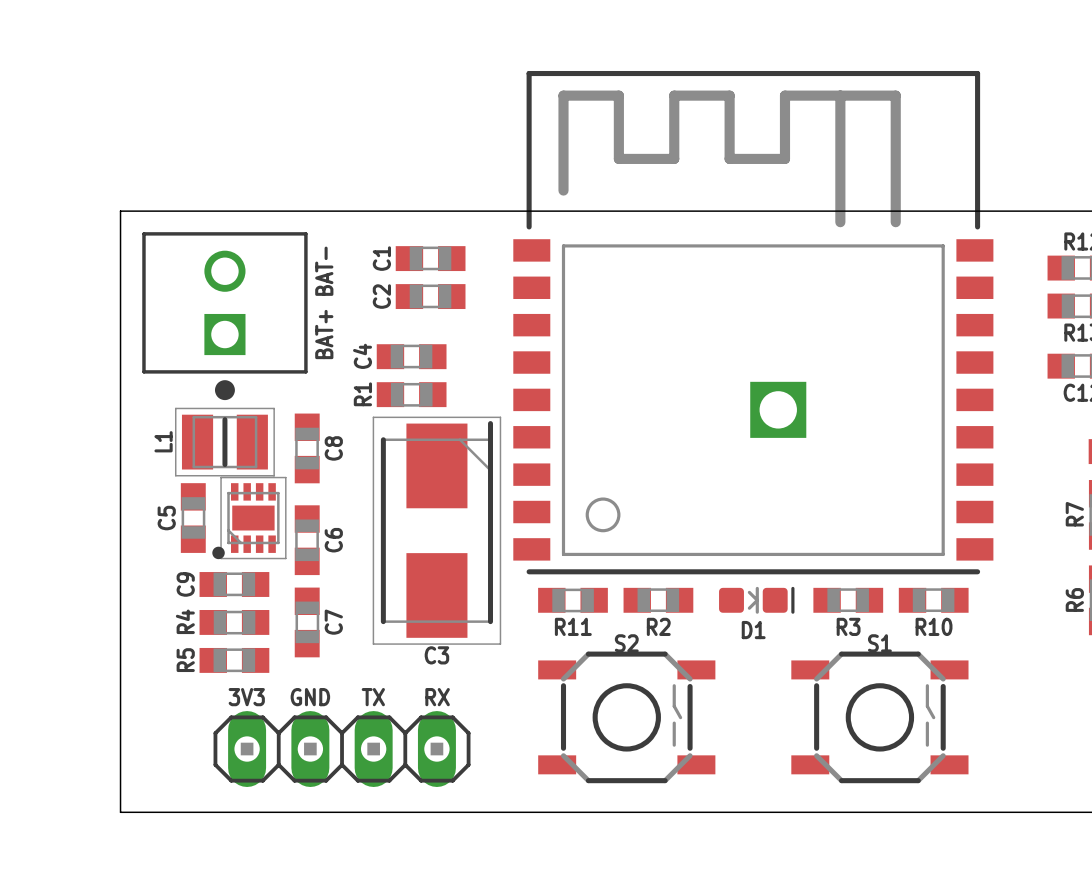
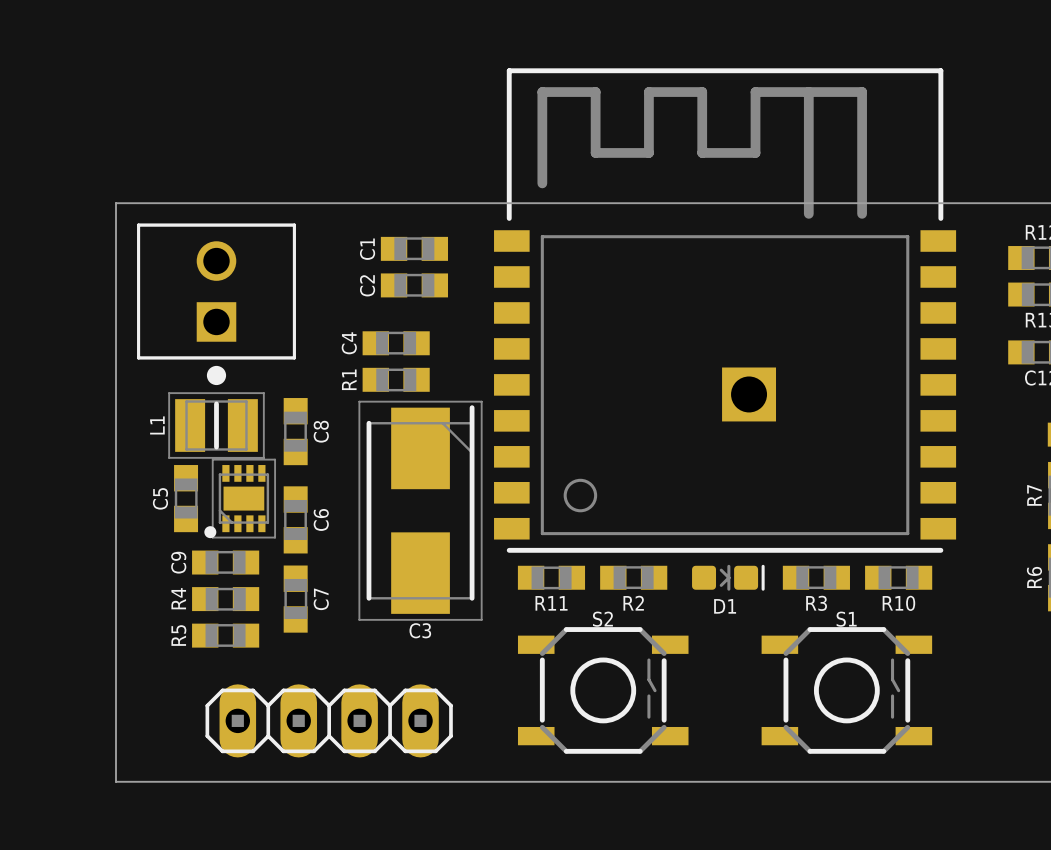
text: BAT- (324, 271) -> none
text: BAT+ (324, 334) -> none
text: 3V3 (246, 697) -> none
text: GND (310, 697) -> none
text: TX (373, 697) -> none
text: RX (437, 697) -> none

